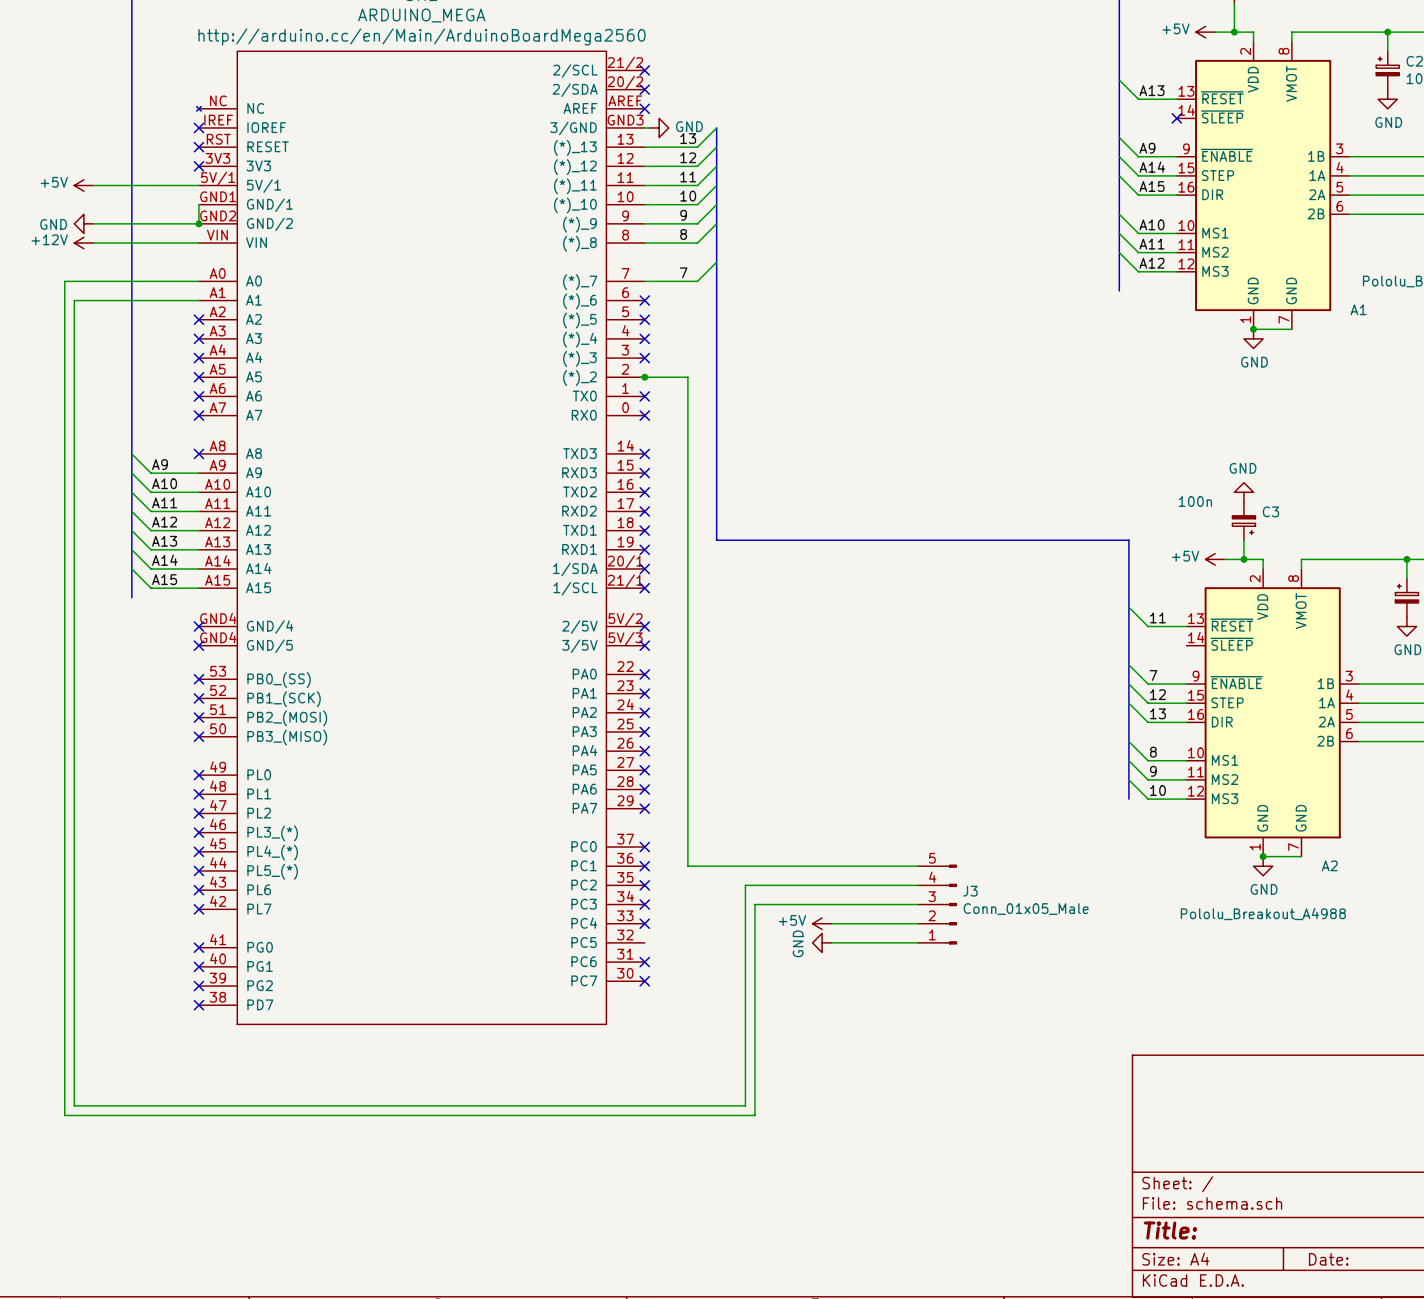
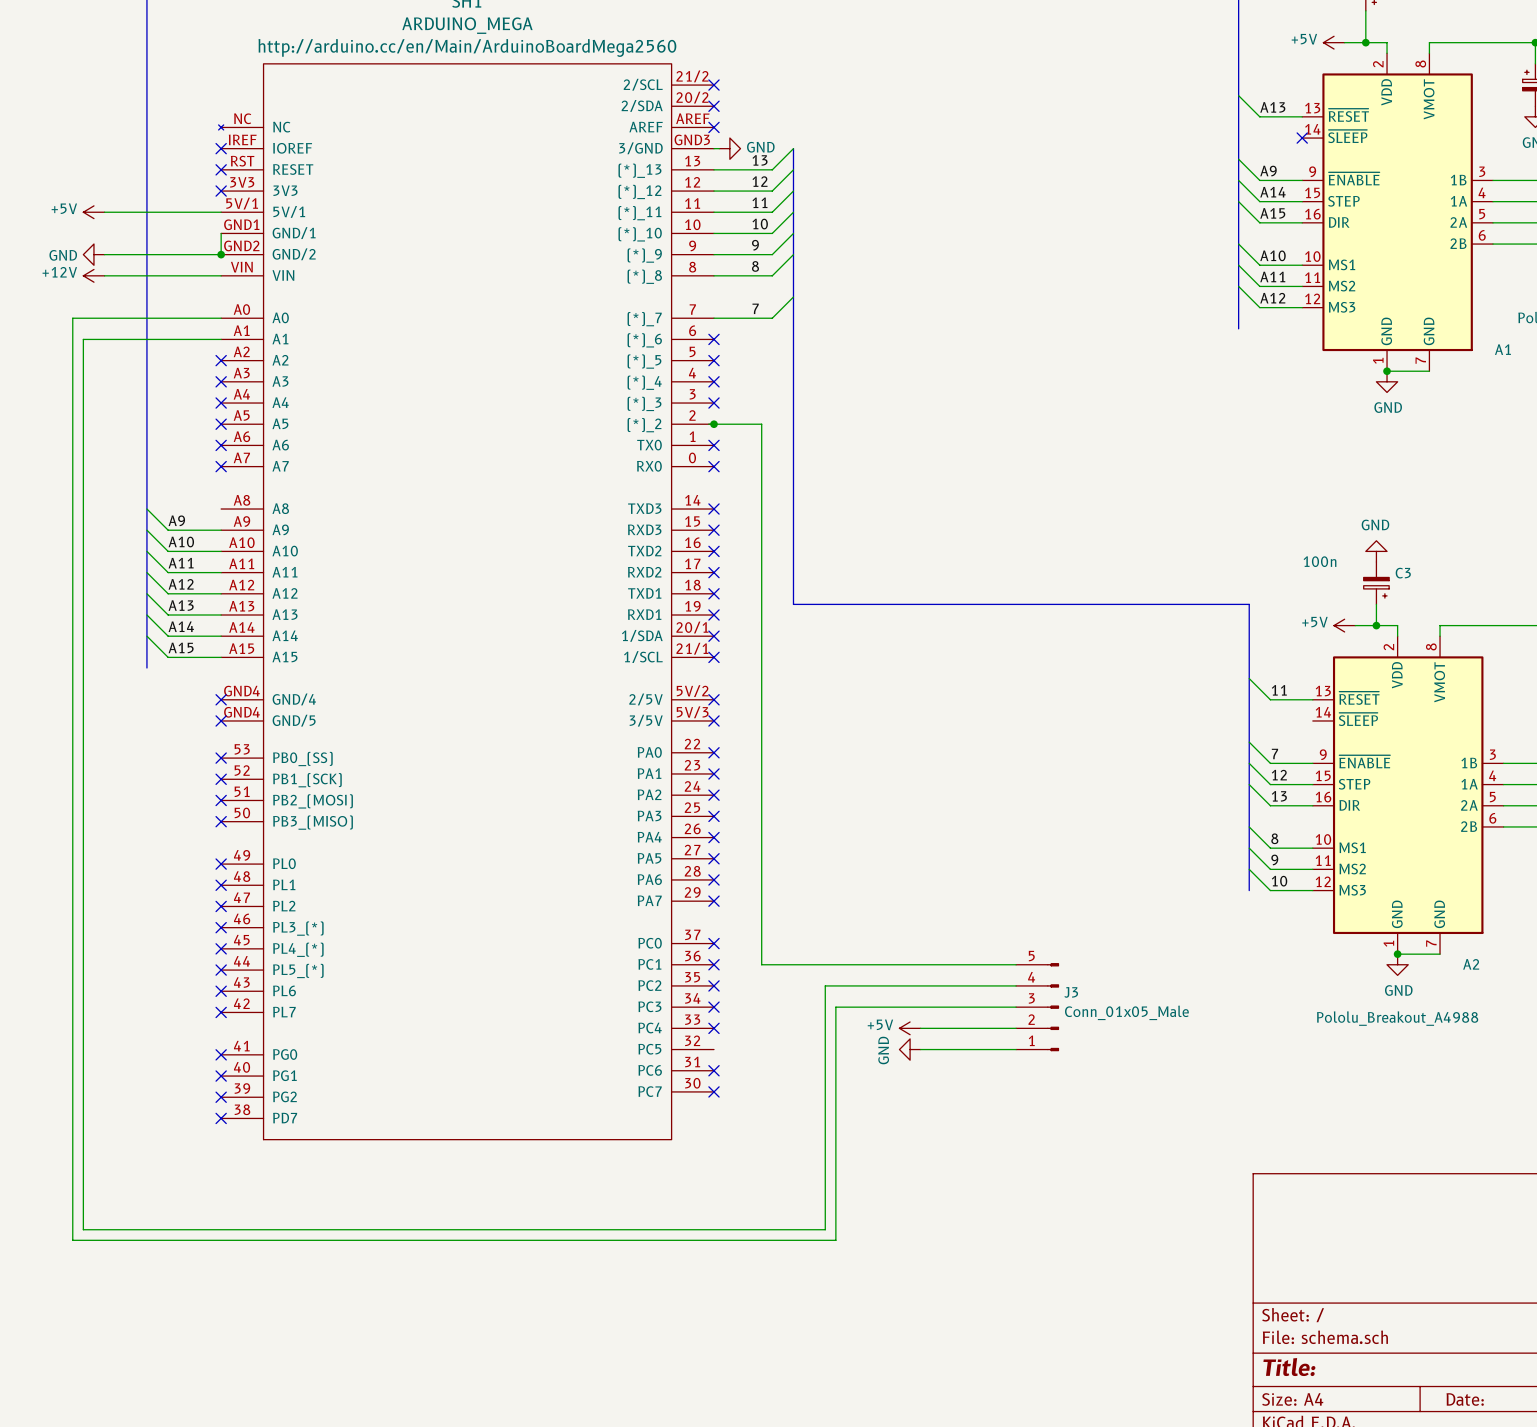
no-connect mark: (198, 453) -> none

